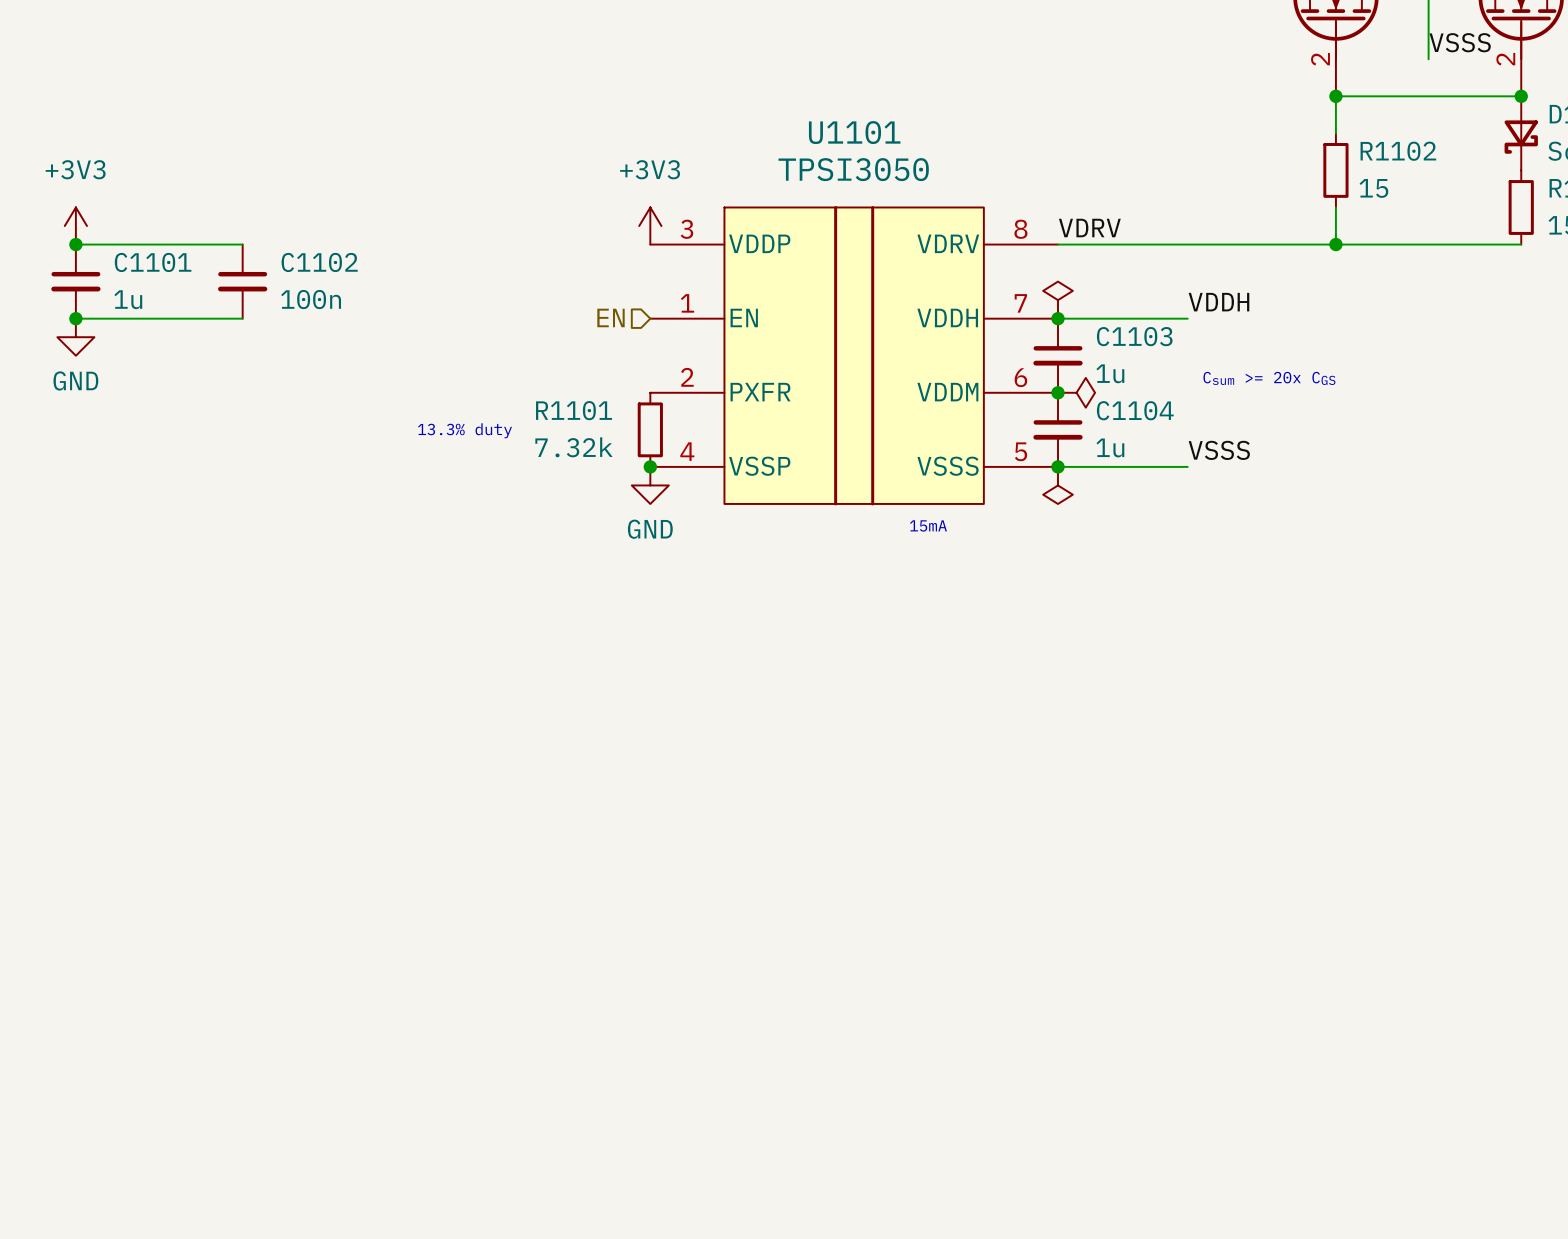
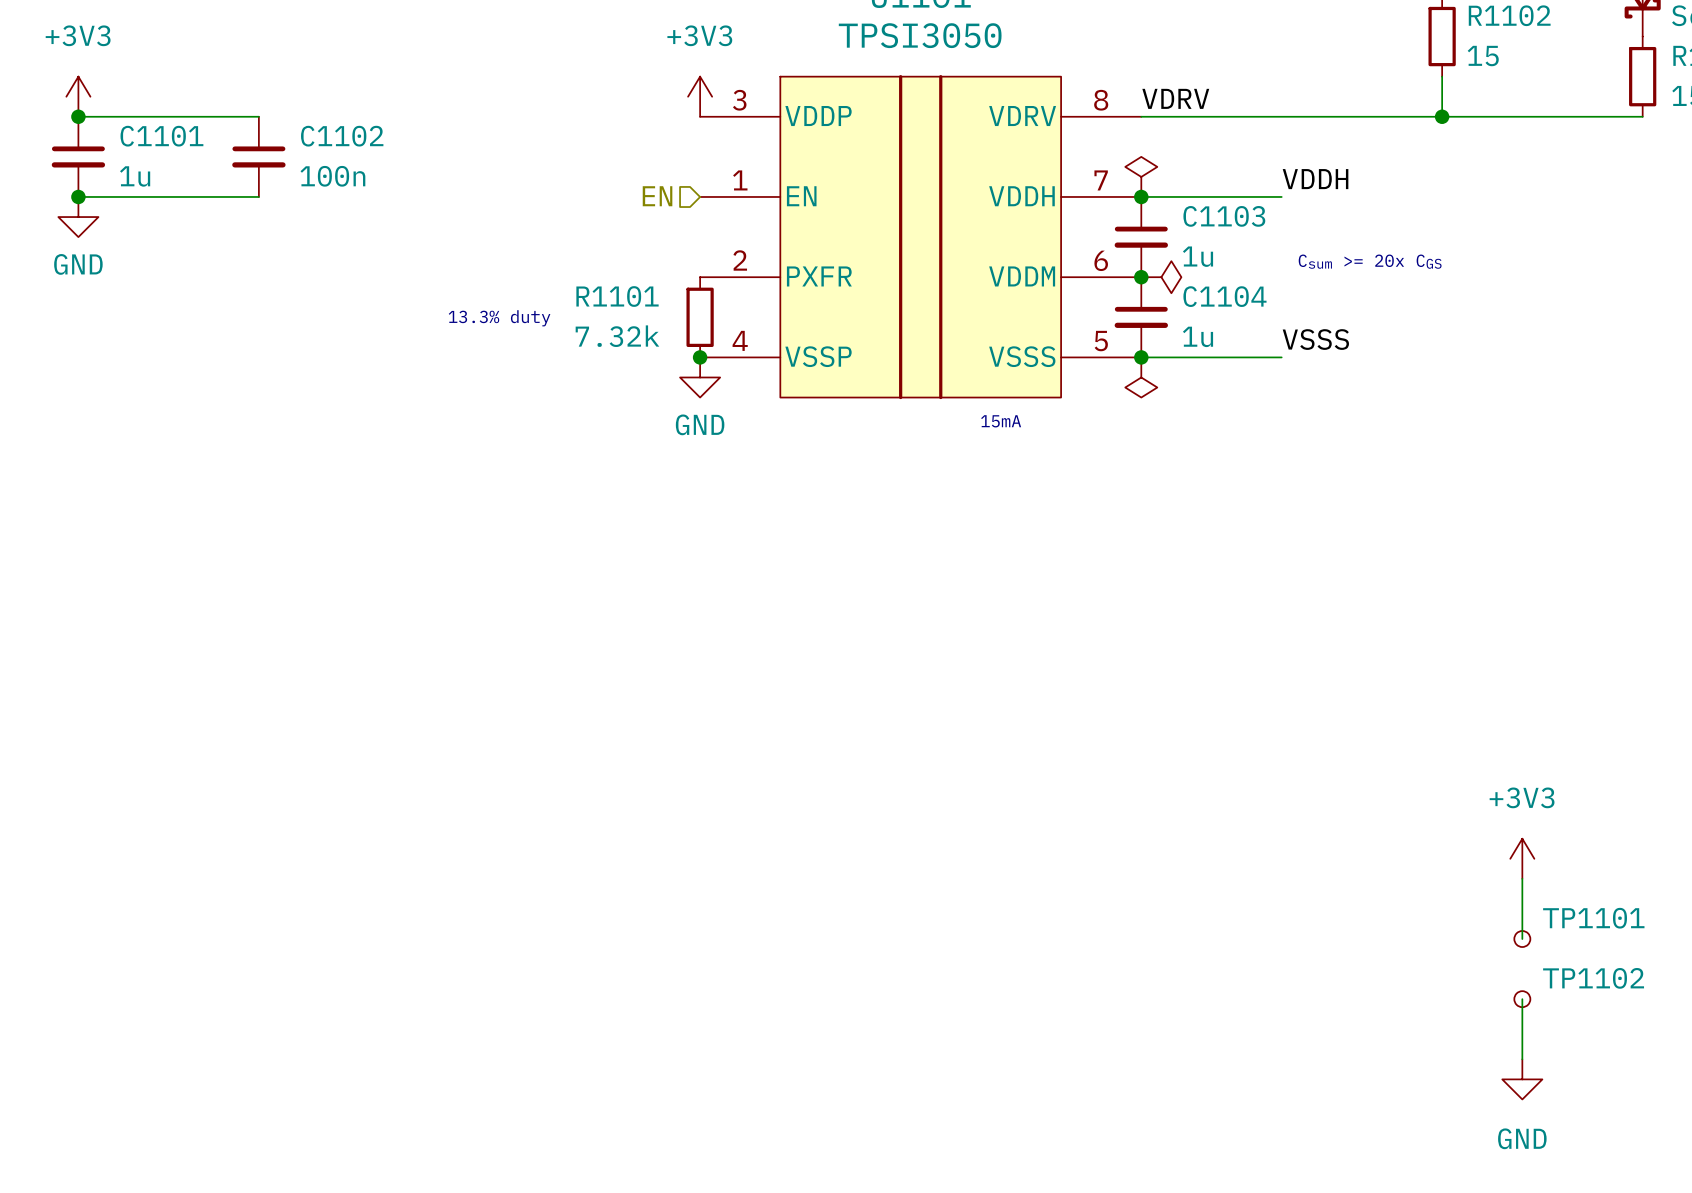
power symbol: none -> +3V3 (1522, 858)
wire: none -> (1522, 878) (1522, 939)
TP1101: none -> (1522, 939)
wire: none -> (1522, 999) (1522, 1059)
TP1102: none -> (1522, 999)
power symbol: none -> GND (1522, 1079)

